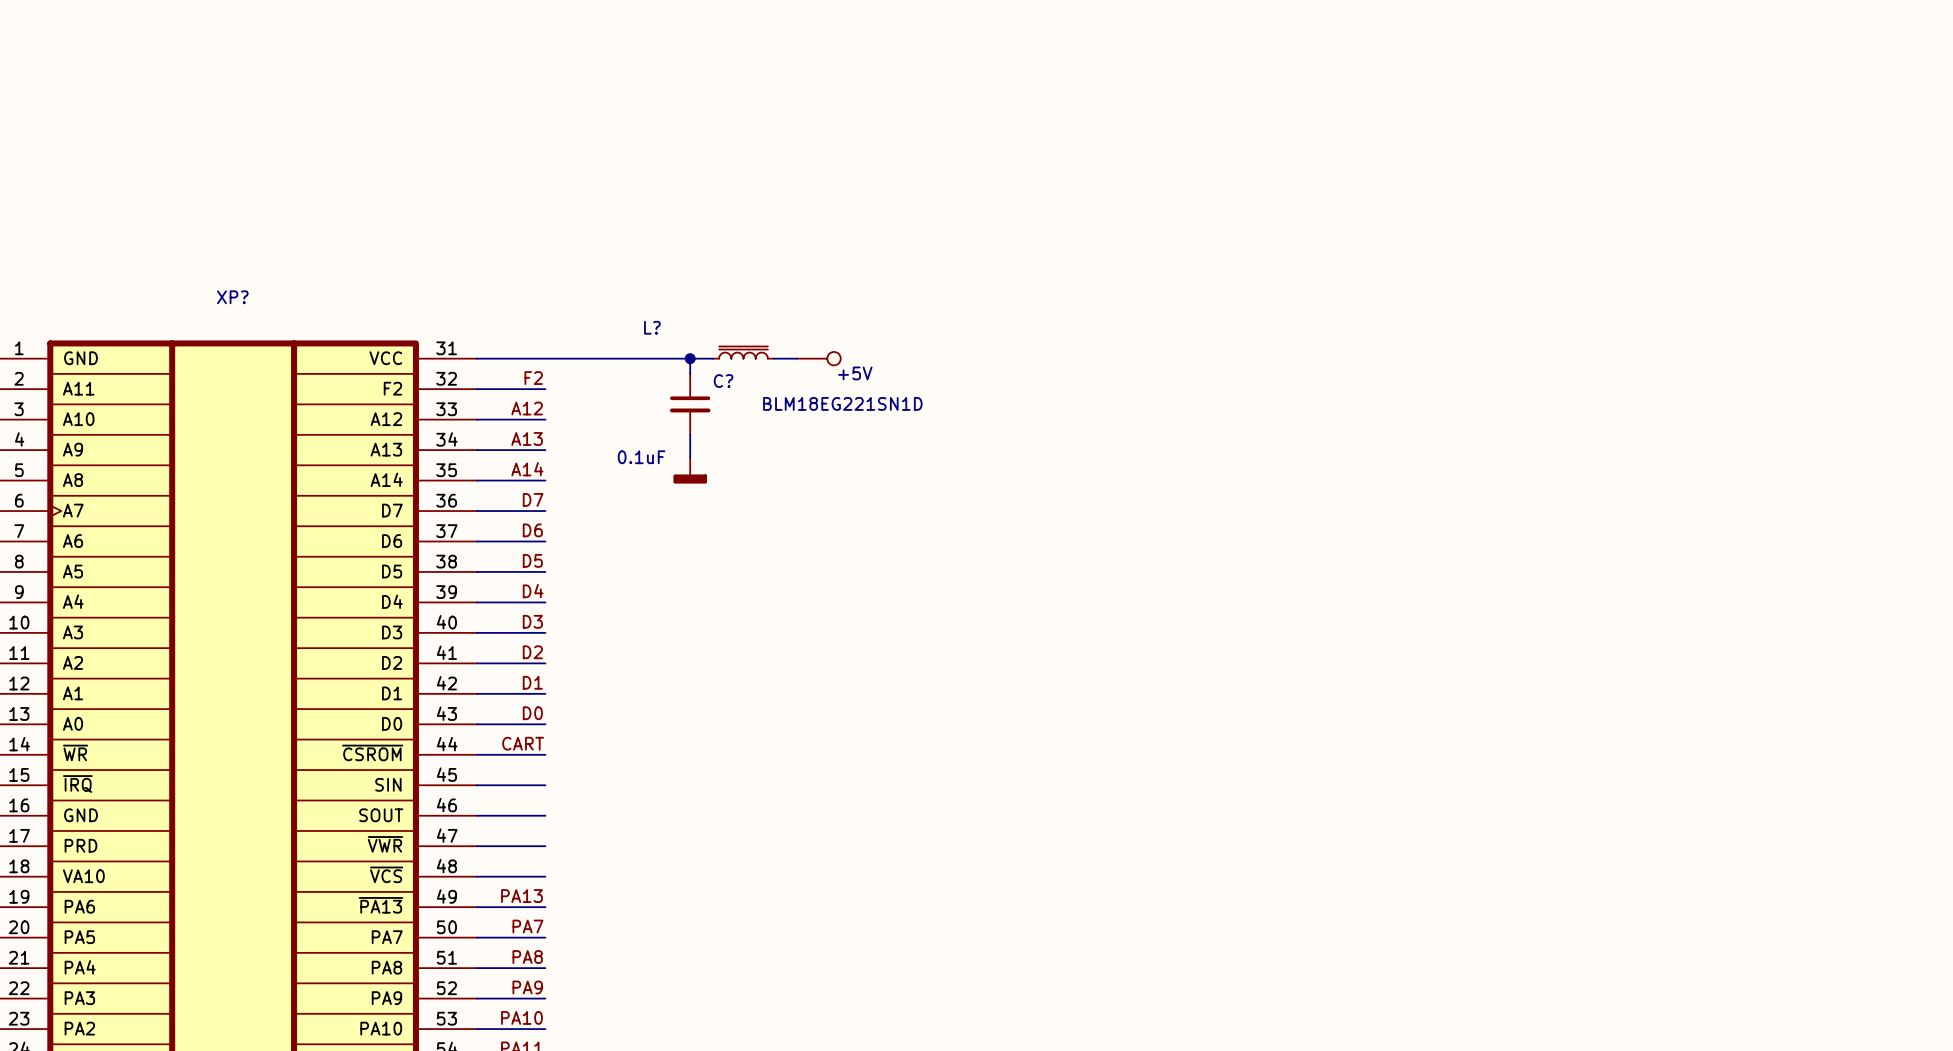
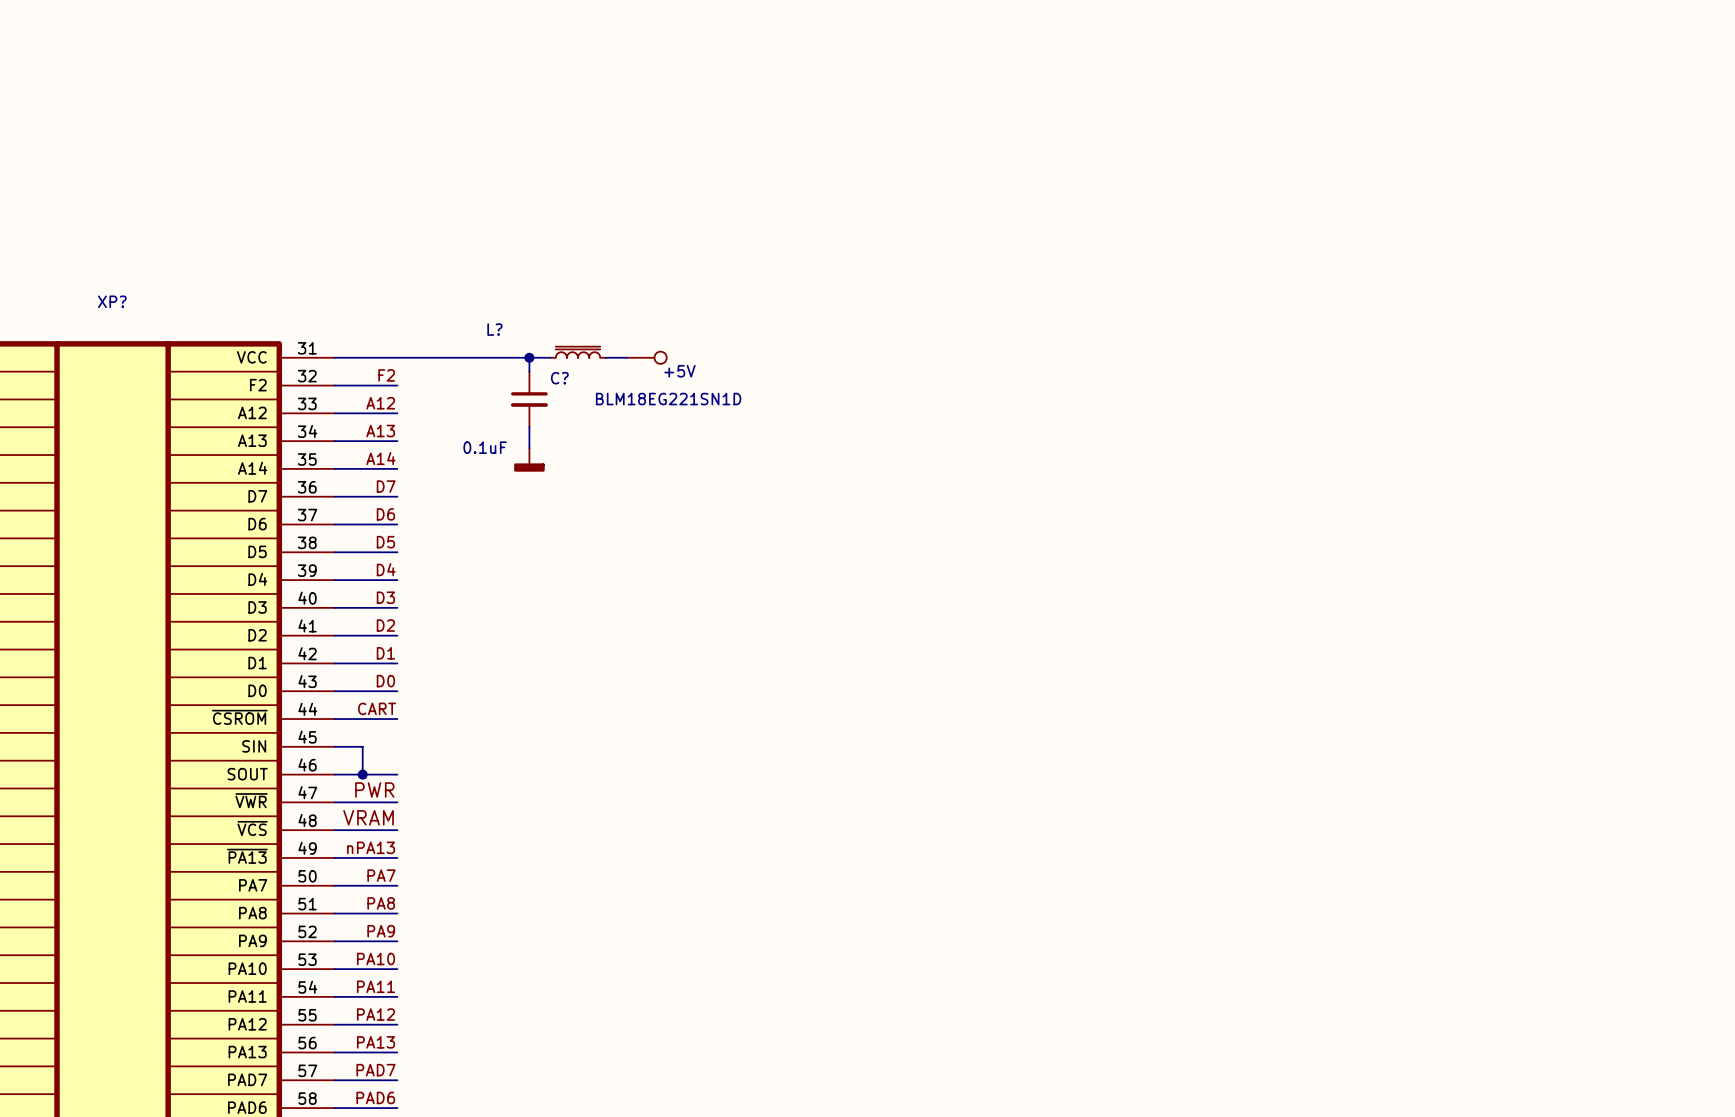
wire: (507, 785) (545, 785) -> (362, 746) (362, 774)
junction: none -> (362, 774)
label: none -> PWR (374, 789)
label: none -> VRAM (368, 817)
label: PA13 (521, 896) -> nPA13 (371, 847)

